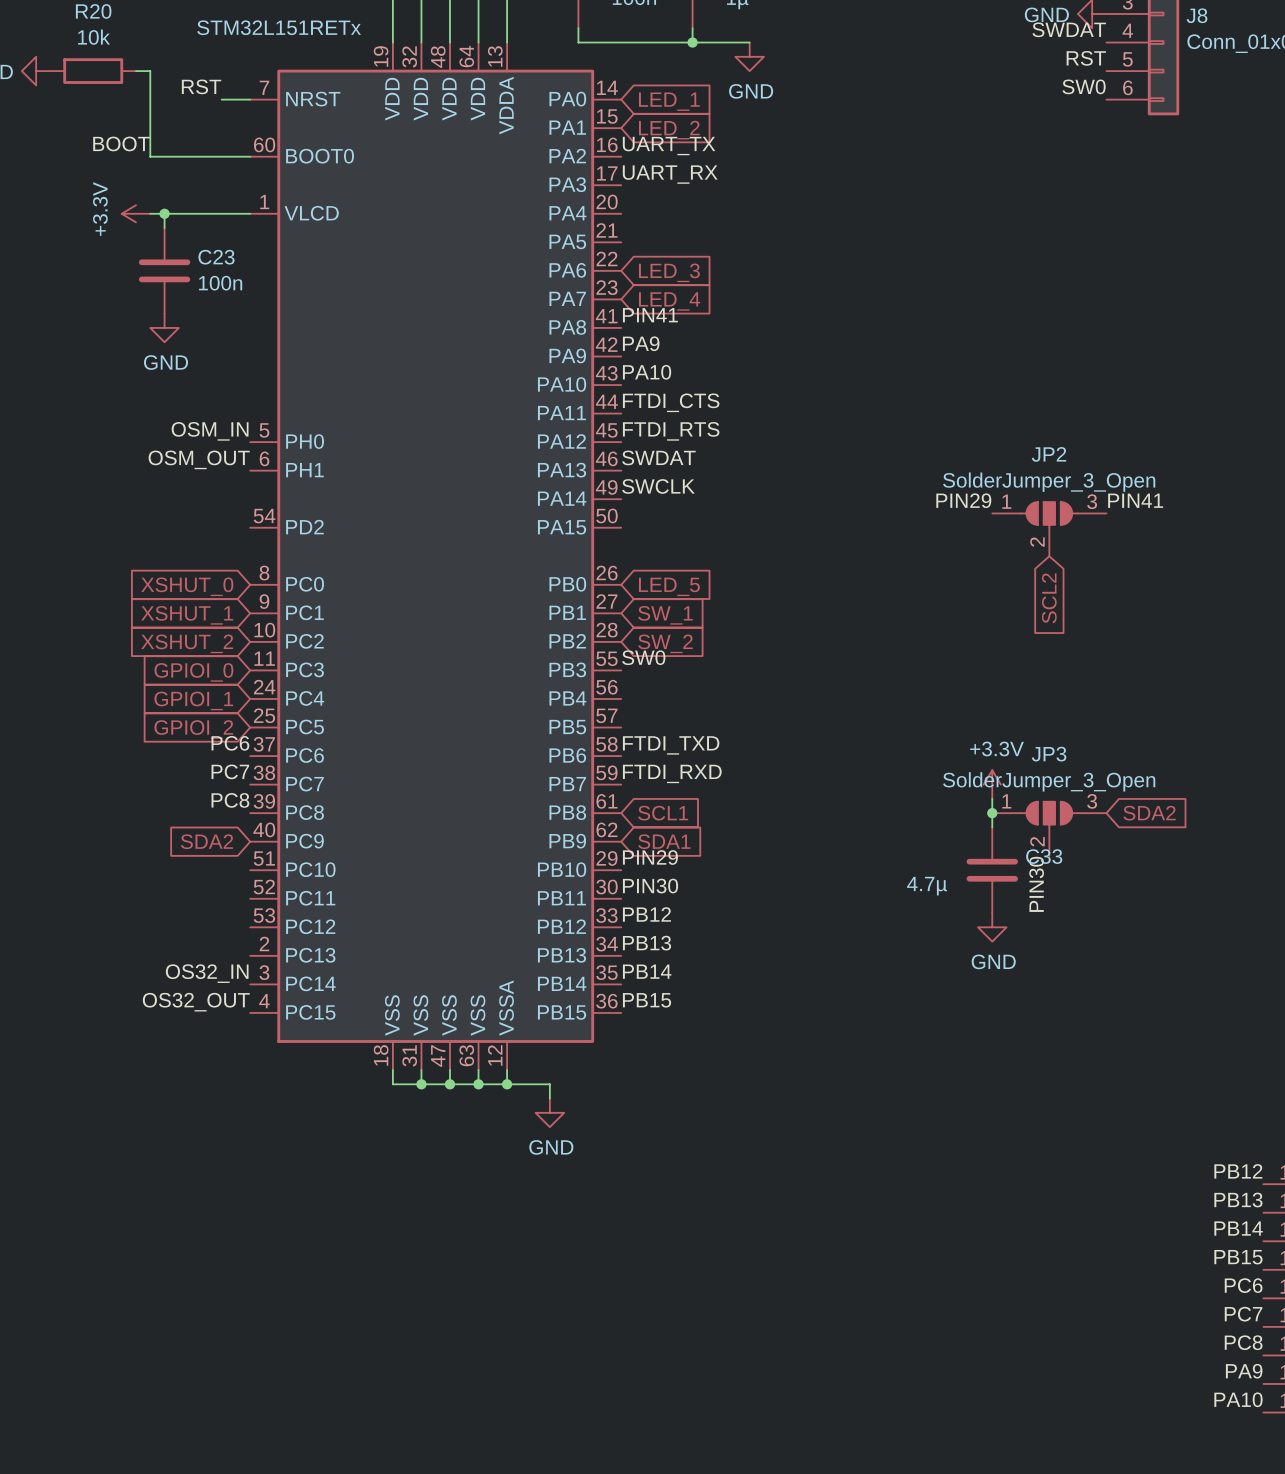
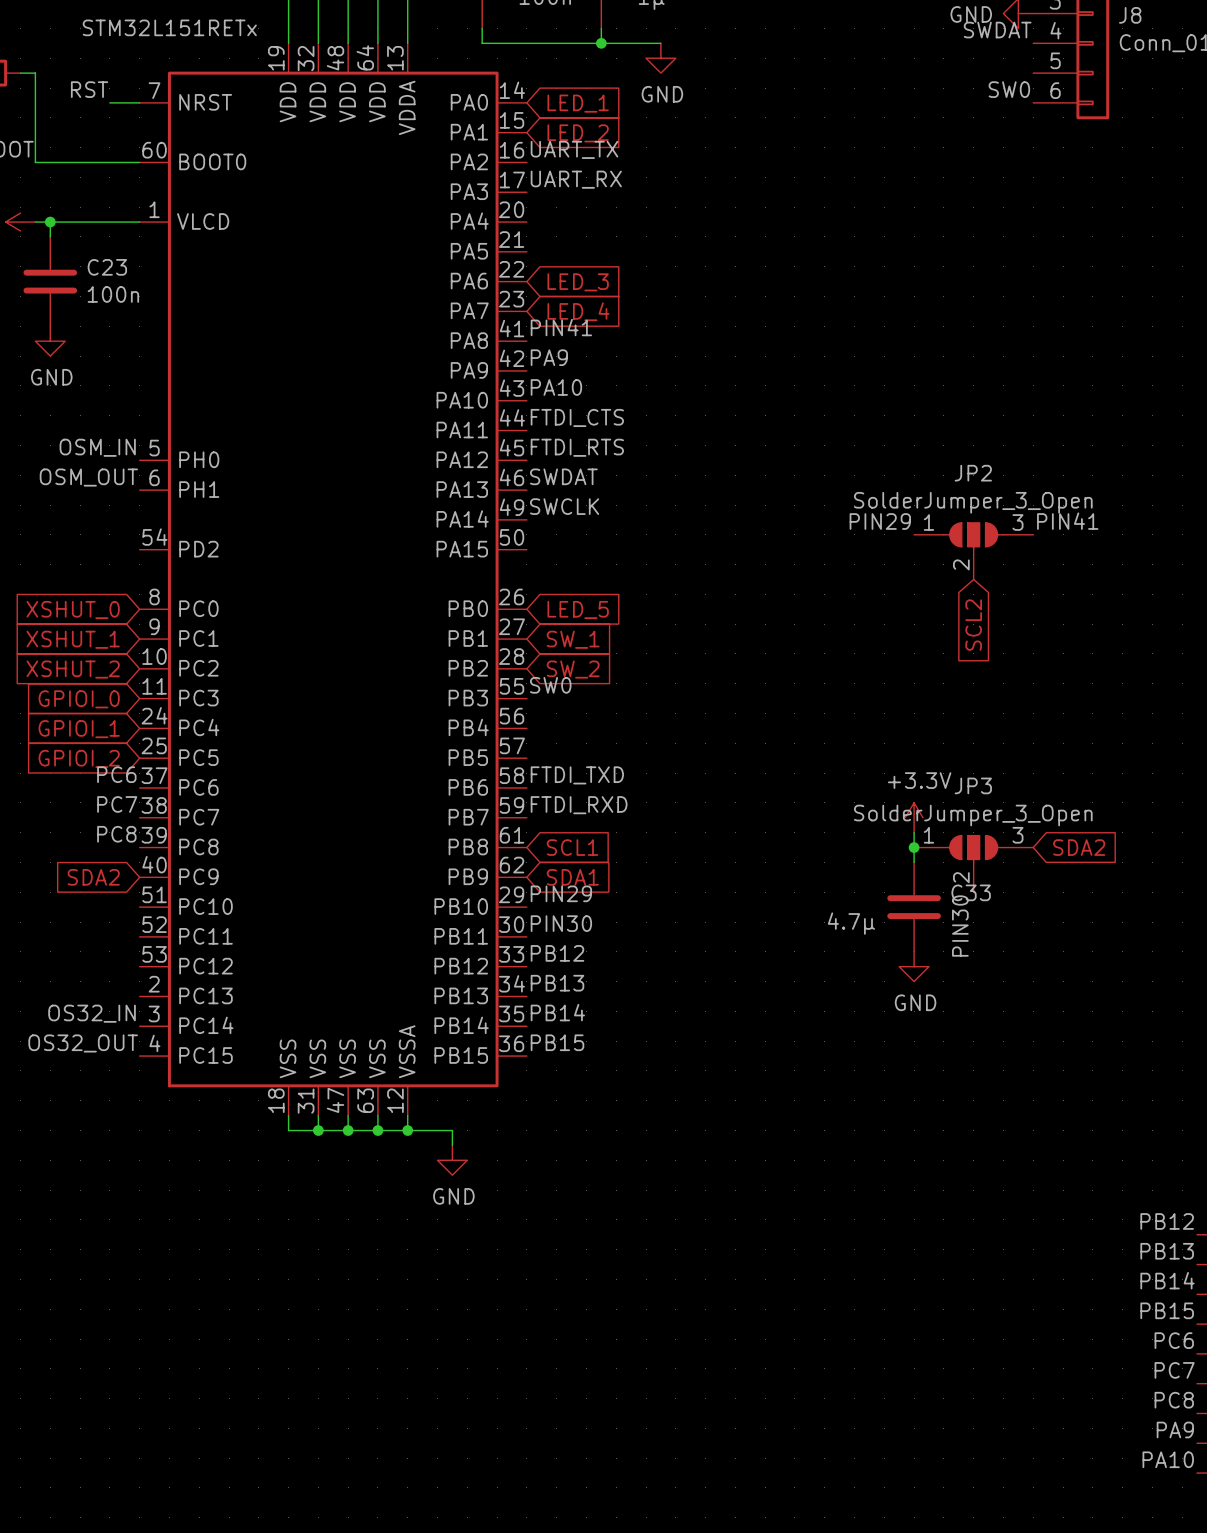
label: RST (1086, 58) -> none

